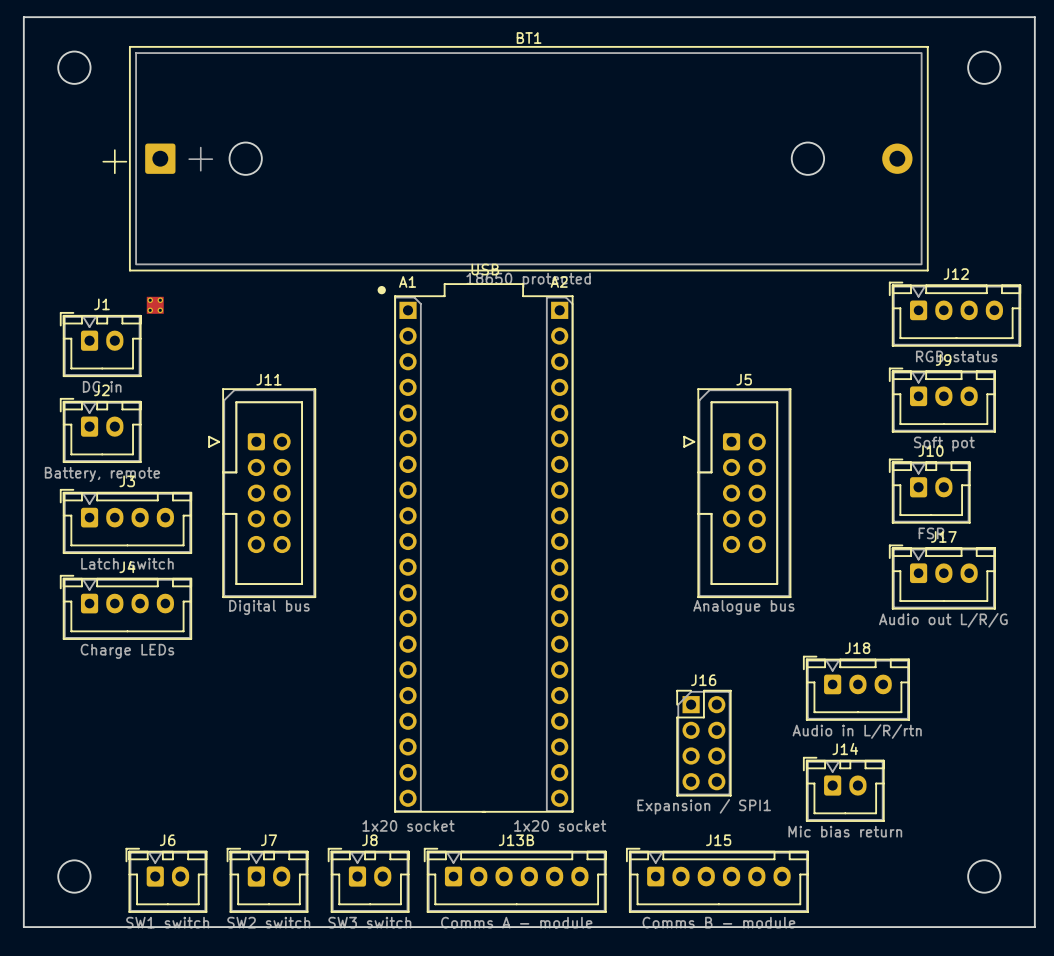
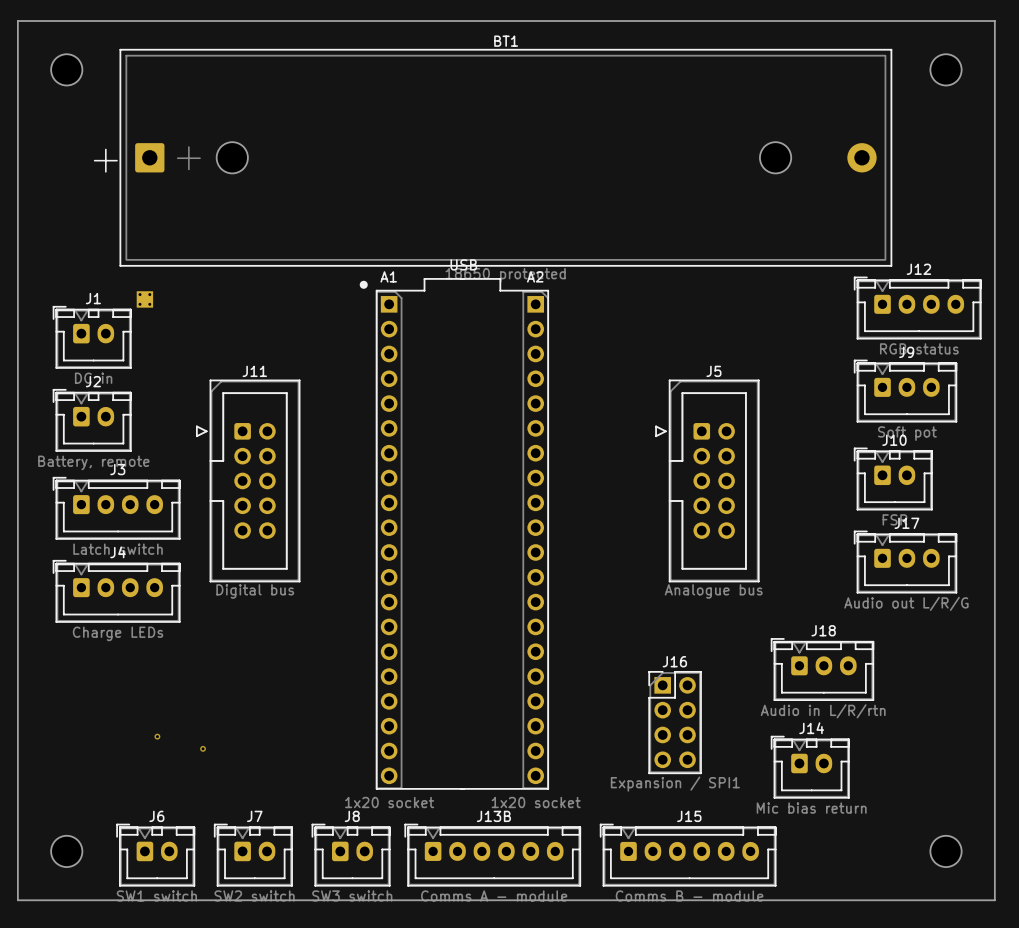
via: none -> (157, 736)
via: none -> (203, 748)

